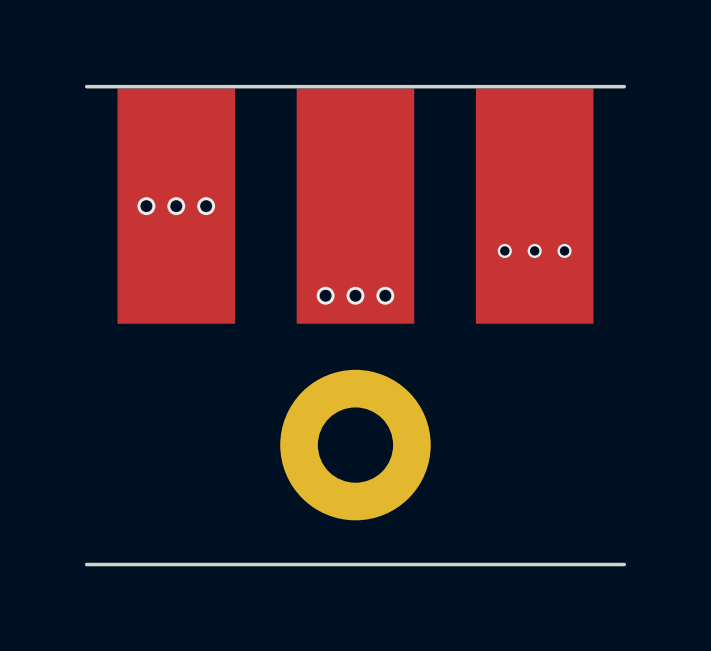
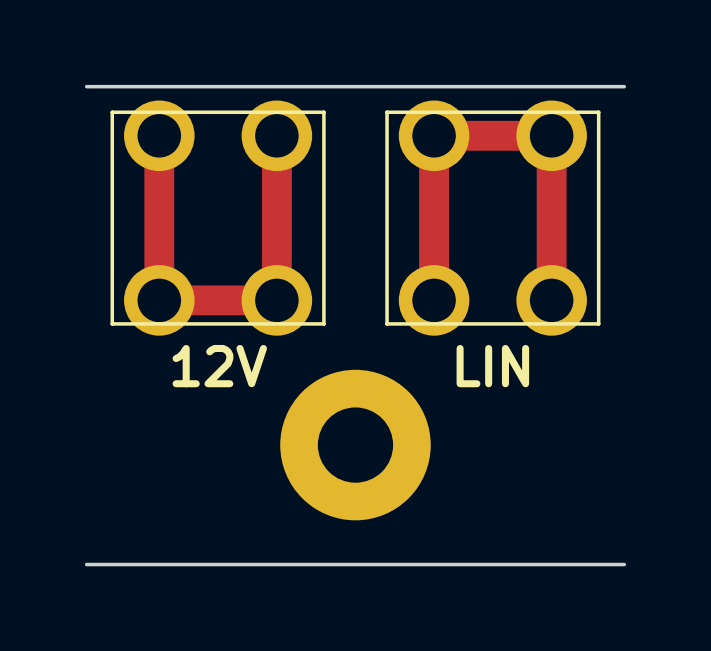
track: none -> (159, 135) (159, 300) (276, 300) (276, 135)
via: (146, 206) -> none
part: (176, 206) -> none
via: (176, 206) -> none
via: (206, 206) -> none
part: (355, 206) -> none
part: (534, 206) -> none
part: none -> (218, 218)
part: none -> (492, 218)
via: (504, 250) -> none
via: (534, 250) -> none
via: (564, 250) -> none
via: (325, 295) -> none
via: (355, 295) -> none
via: (385, 295) -> none
track: none -> (434, 300) (434, 135) (551, 135) (551, 300)
text: none -> 12V (219, 366)
text: none -> LIN (492, 366)

